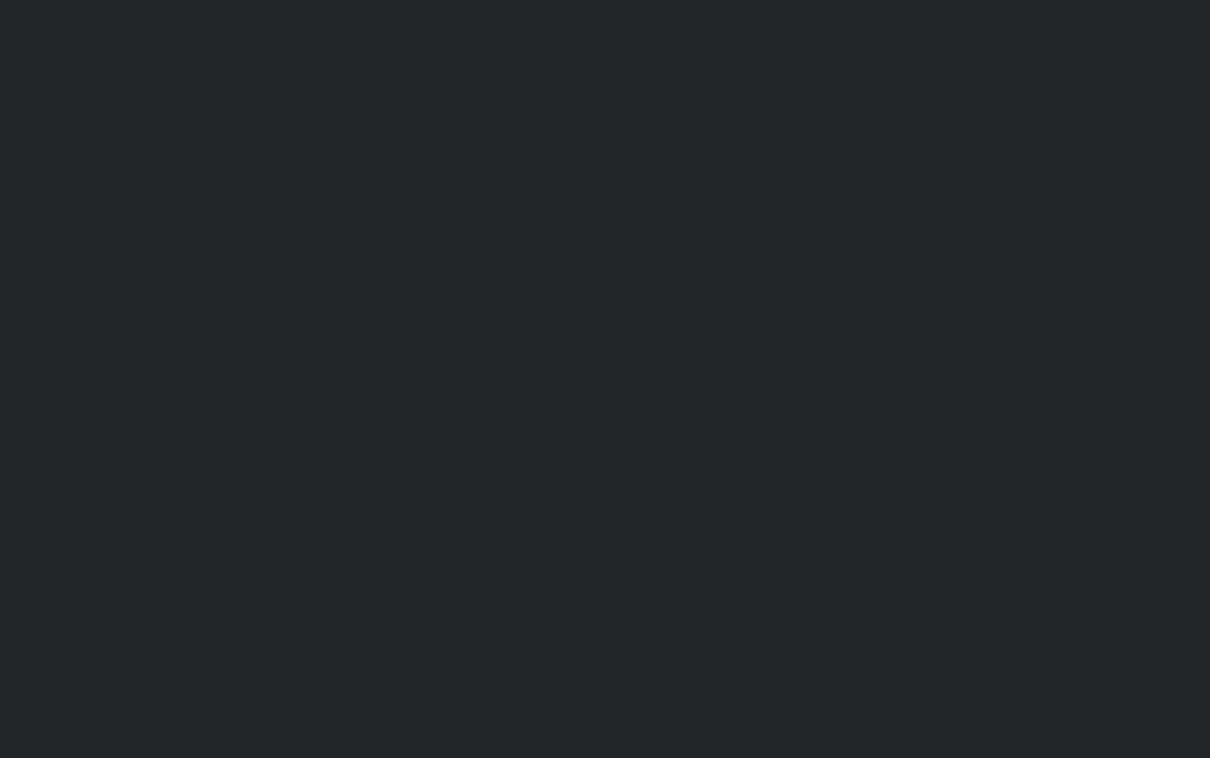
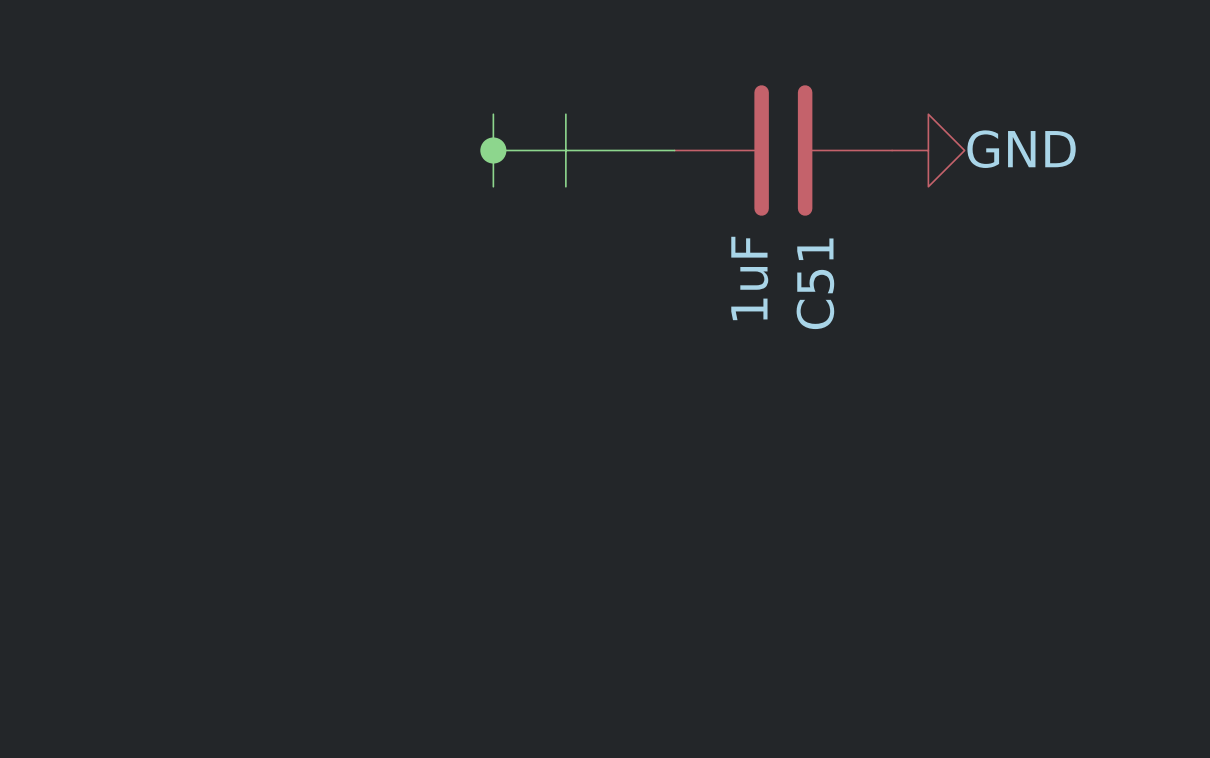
wire: none -> (493, 114) (493, 186)
wire: none -> (565, 114) (565, 186)
wire: none -> (493, 150) (674, 150)
junction: none -> (493, 150)
C51: none -> 1uF (783, 150)
power symbol: none -> GND (928, 150)

